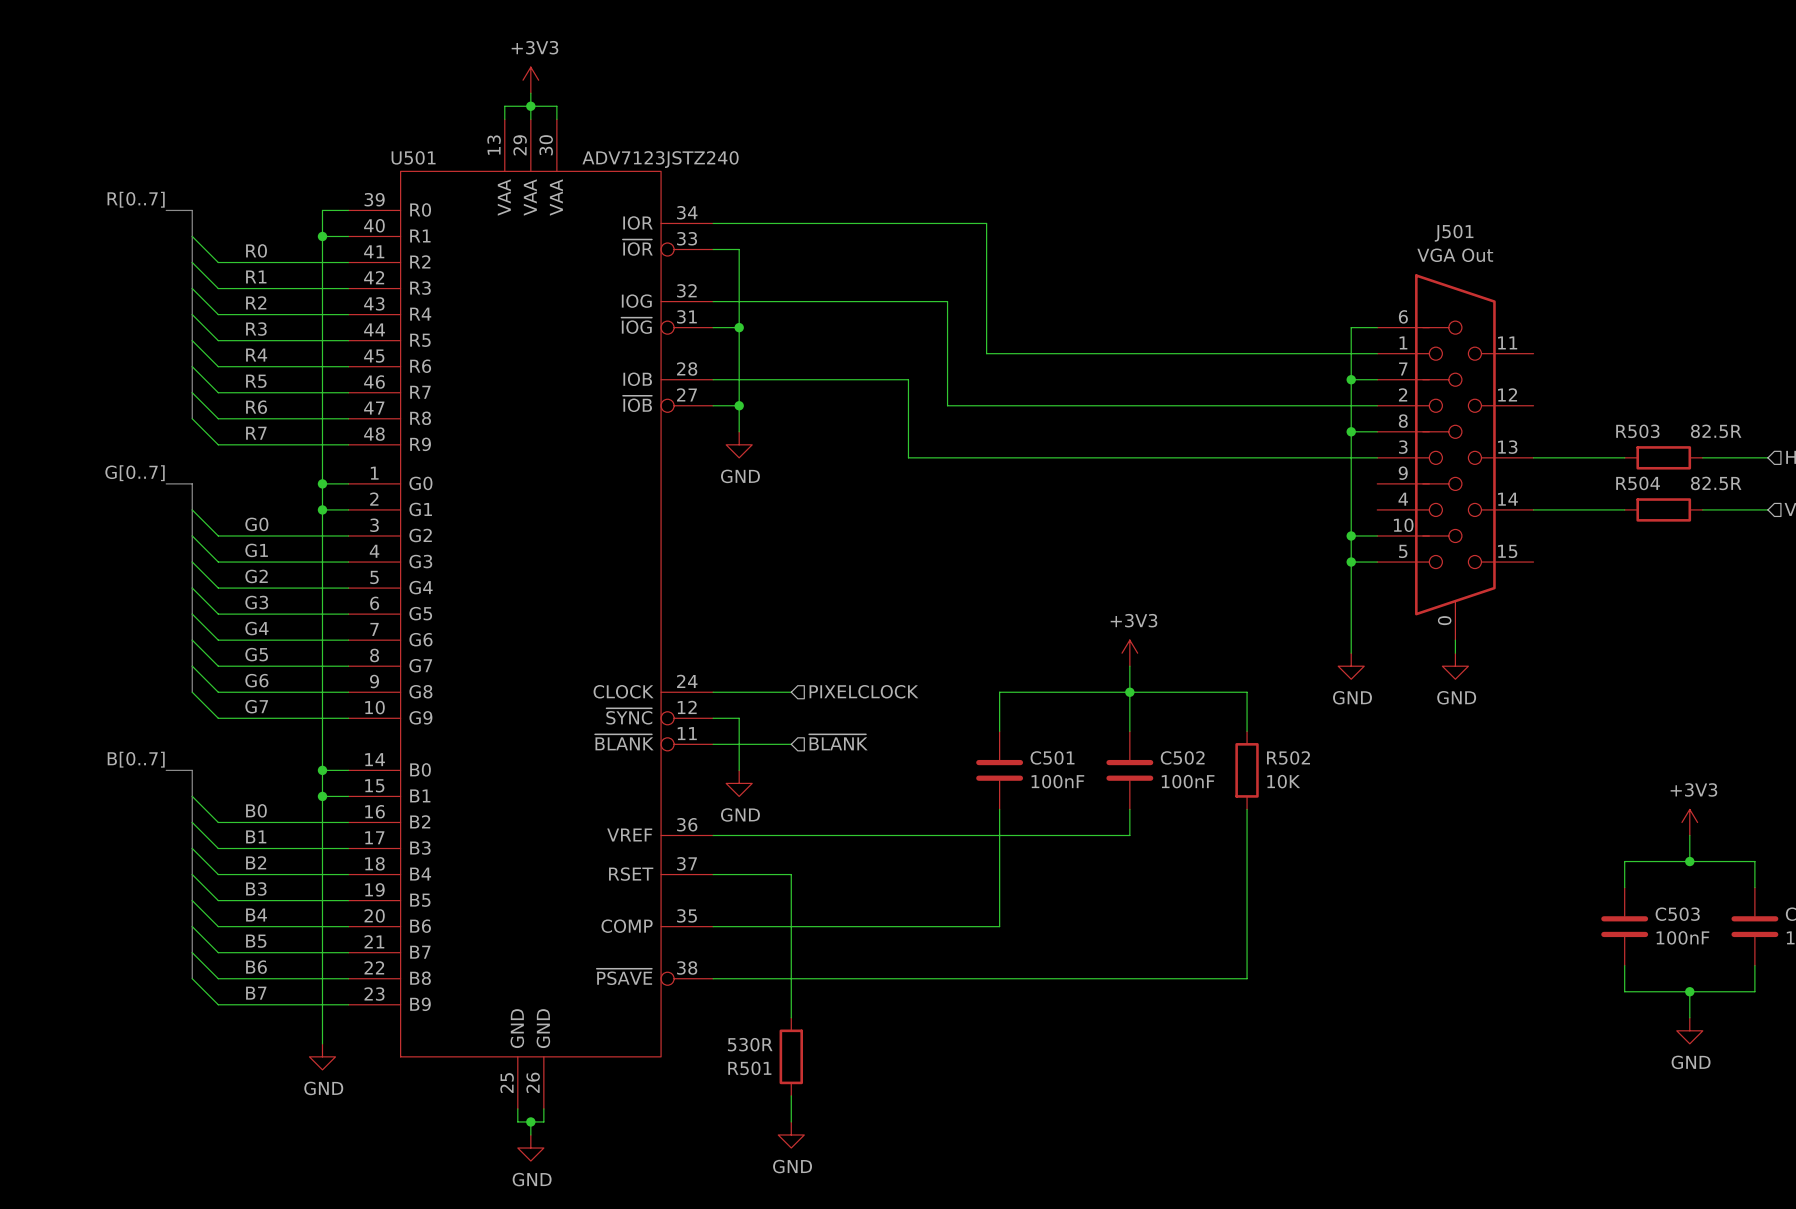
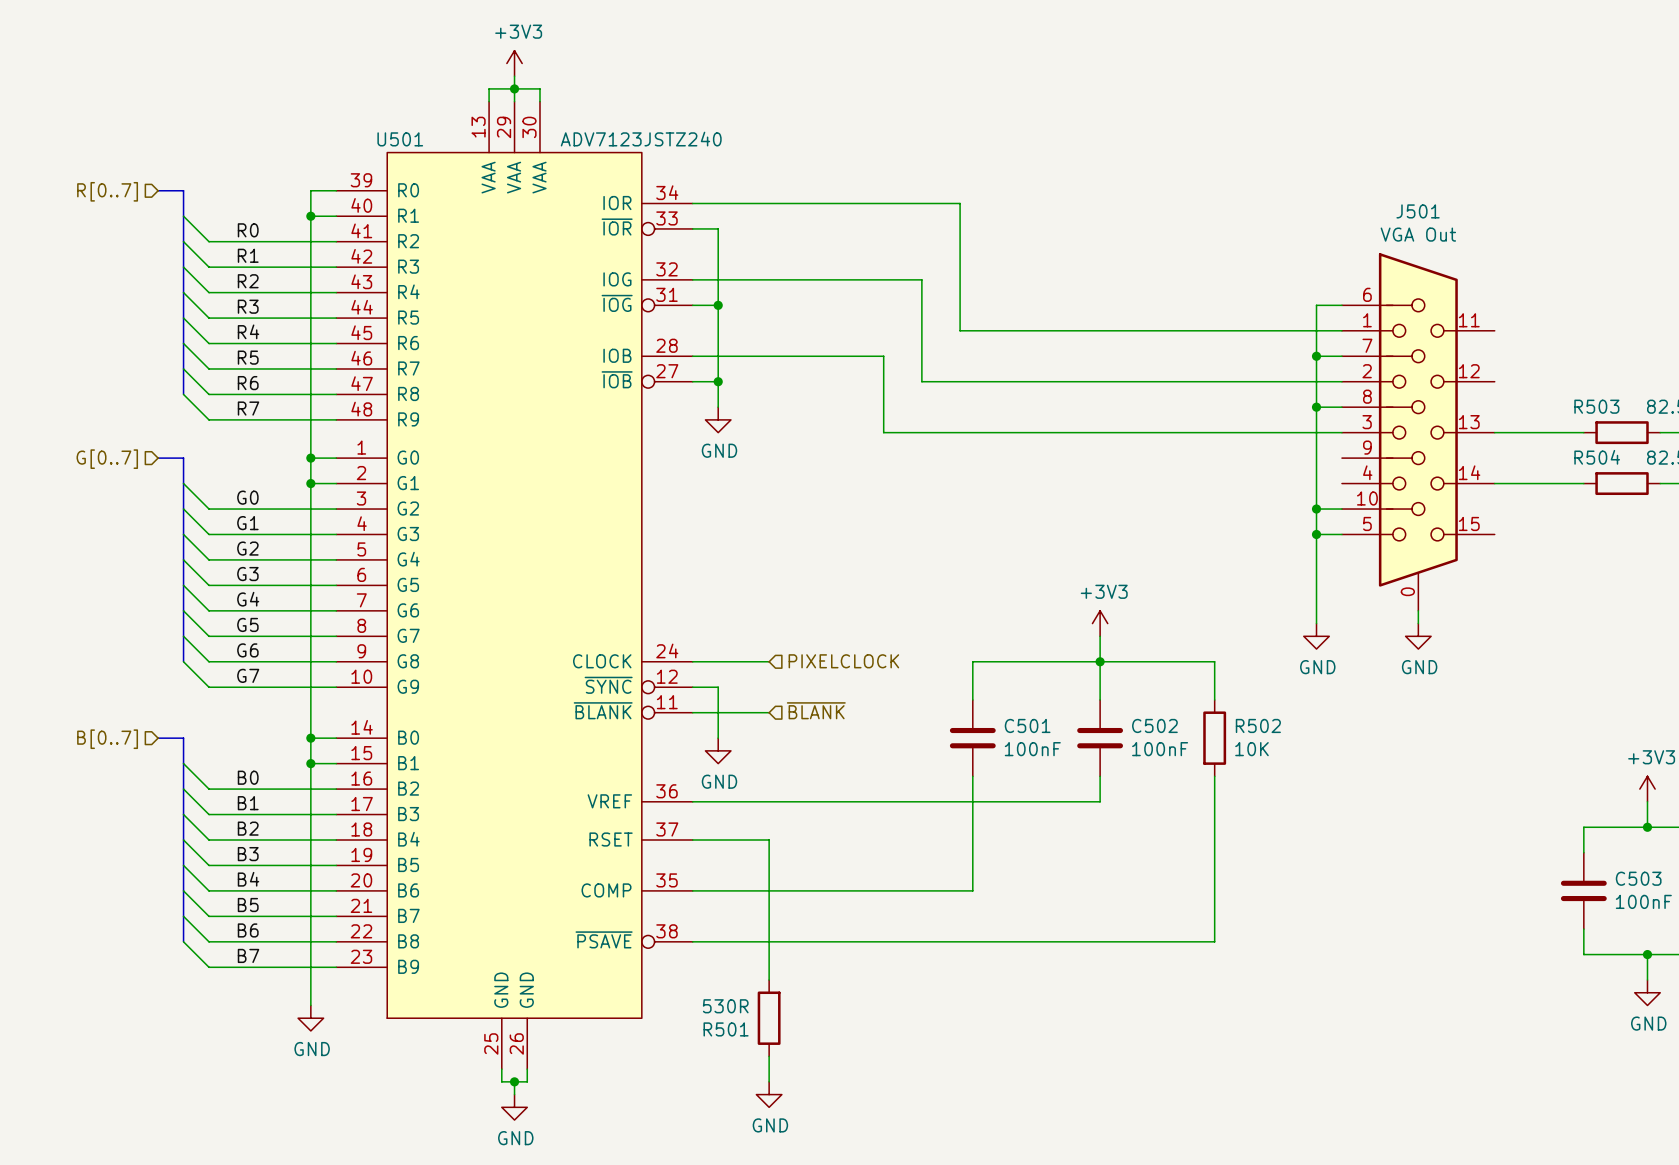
label: R[0..7] (136, 199) -> none
hierarchical label: none -> R[0..7] (107, 191)
label: G[0..7] (135, 473) -> none
hierarchical label: none -> G[0..7] (107, 459)
label: B[0..7] (136, 759) -> none
hierarchical label: none -> B[0..7] (107, 739)

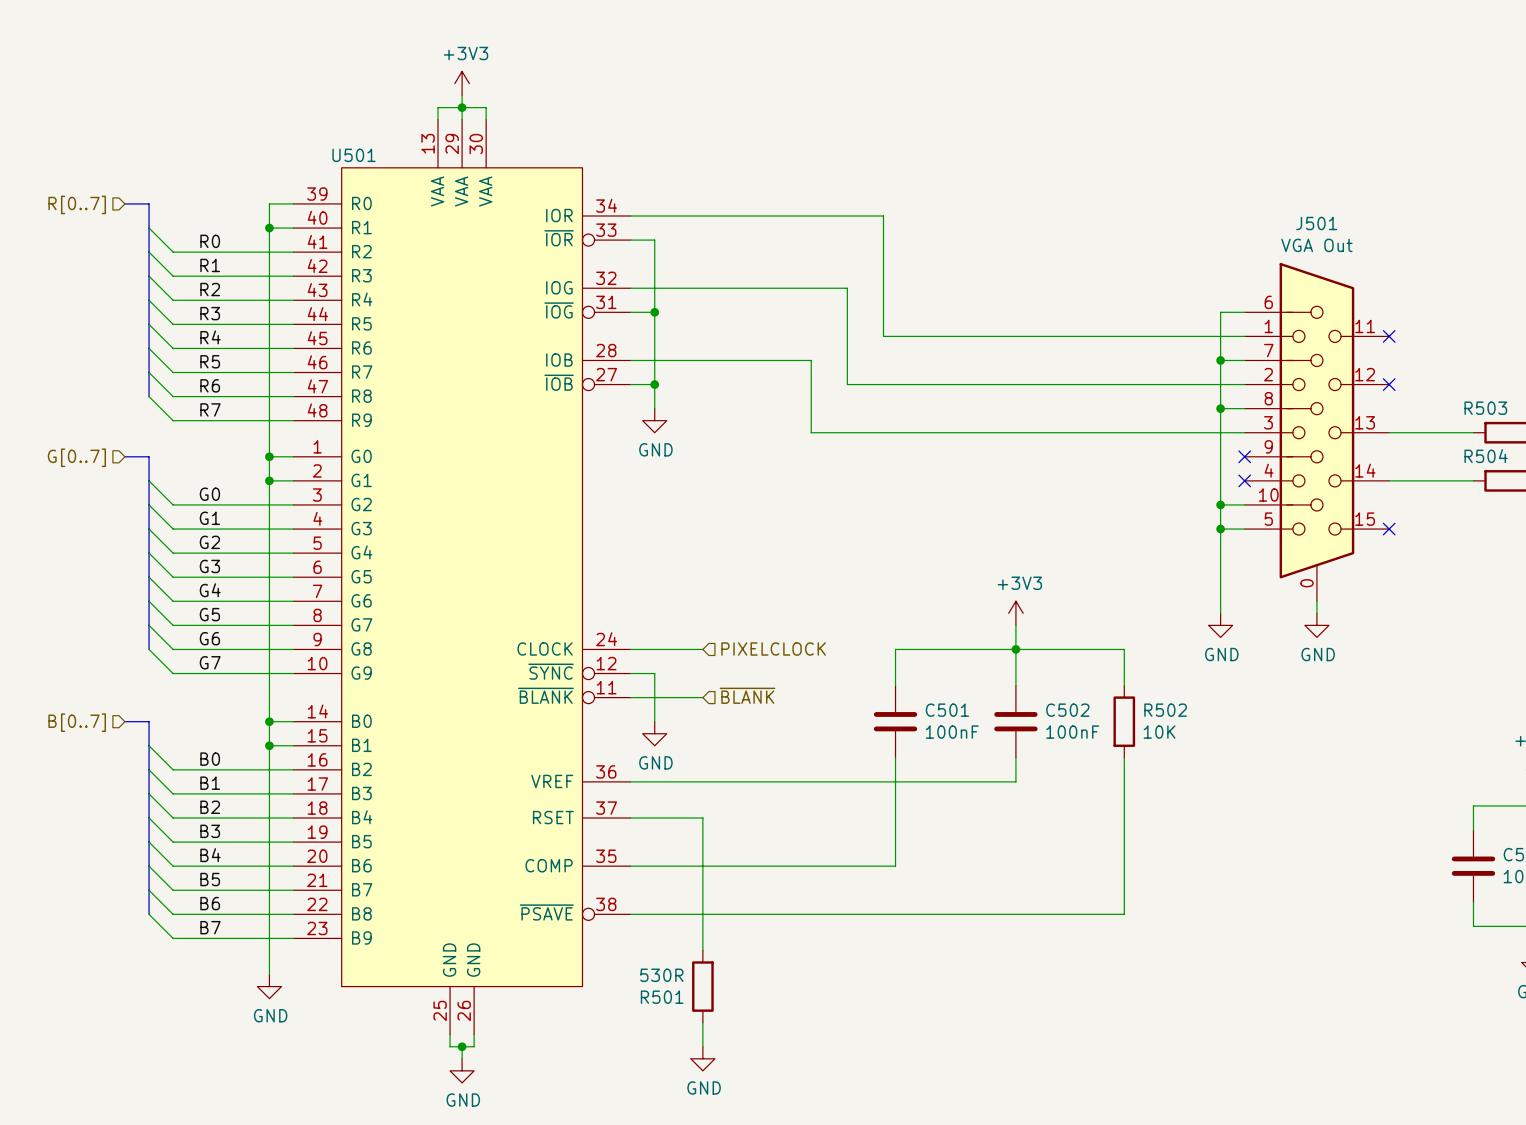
U501 value: ADV7123JSTZ240 (641, 139) -> none
no-connect mark: none -> (1389, 336)
no-connect mark: none -> (1389, 384)
no-connect mark: none -> (1244, 456)
no-connect mark: none -> (1244, 480)
no-connect mark: none -> (1389, 529)

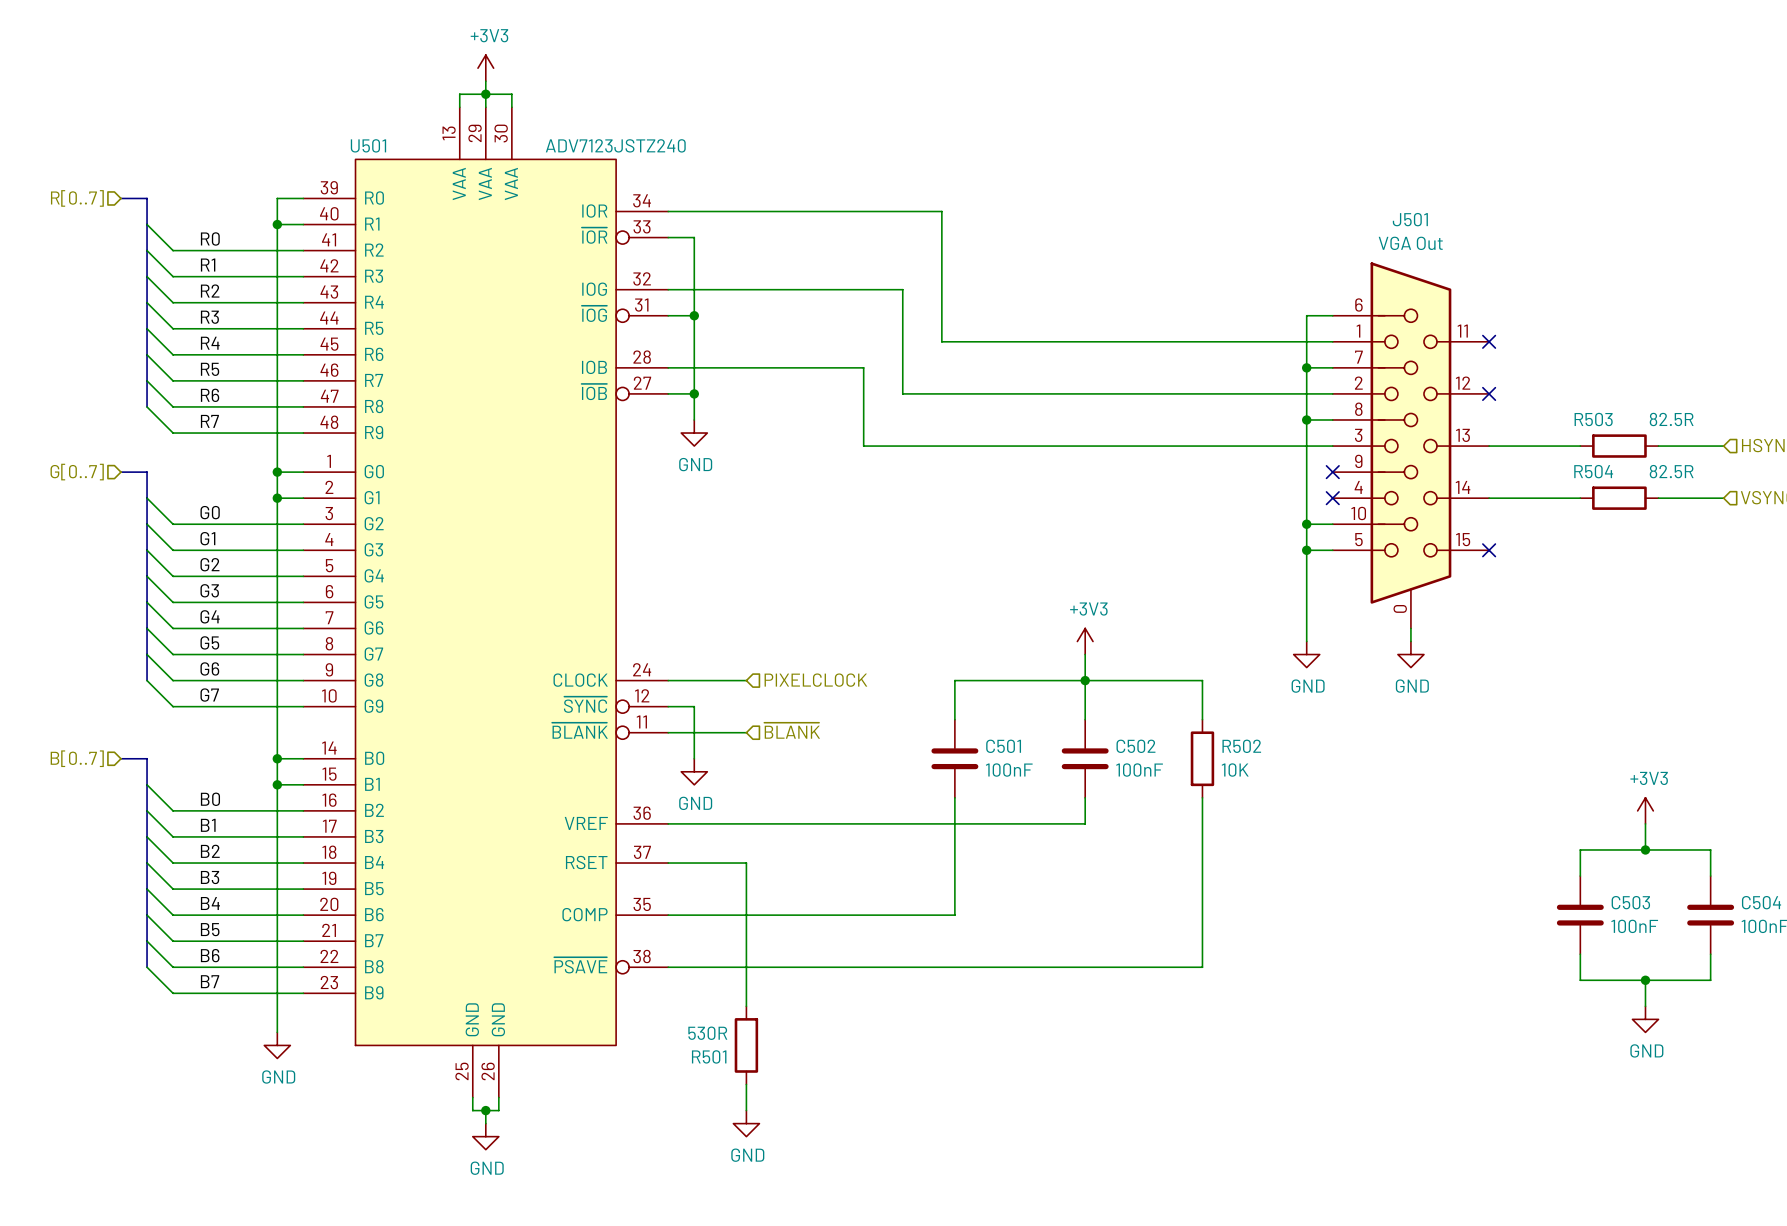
U501 value: none -> ADV7123JSTZ240 (615, 145)

